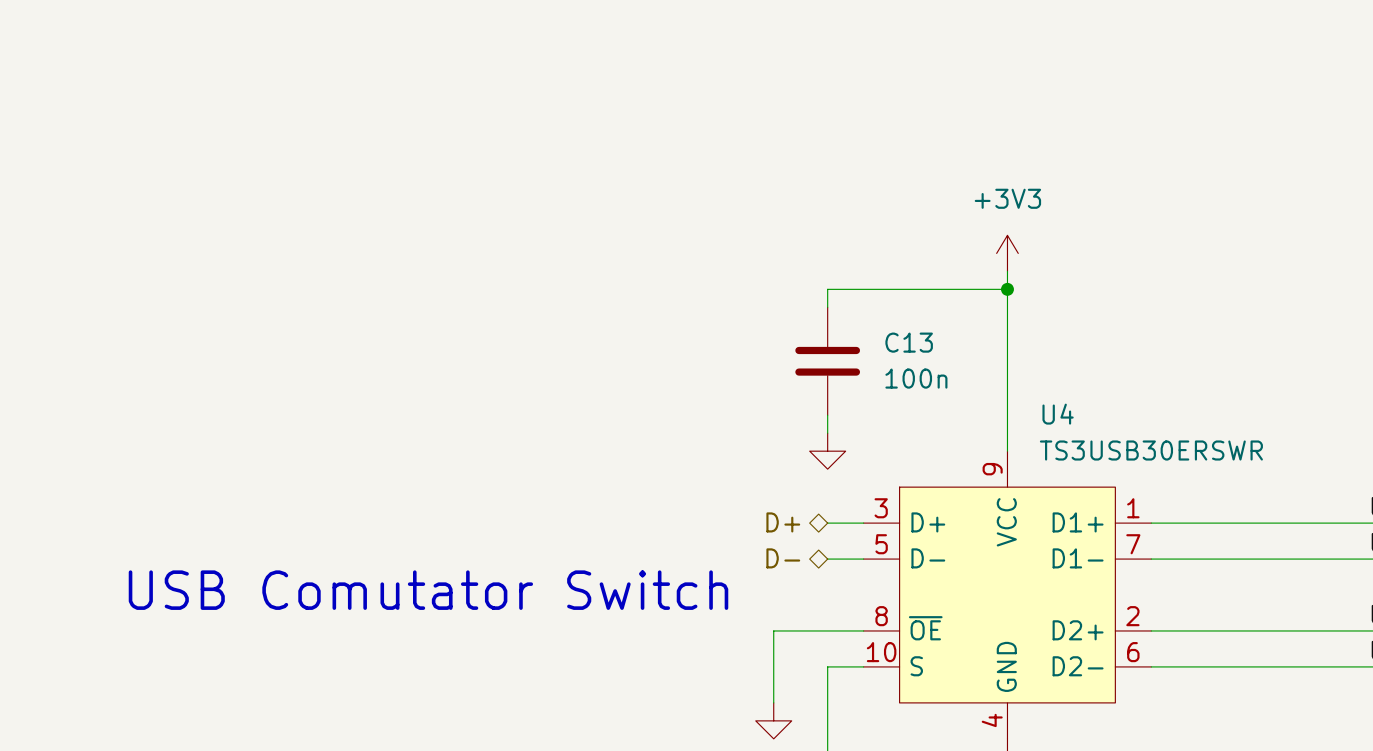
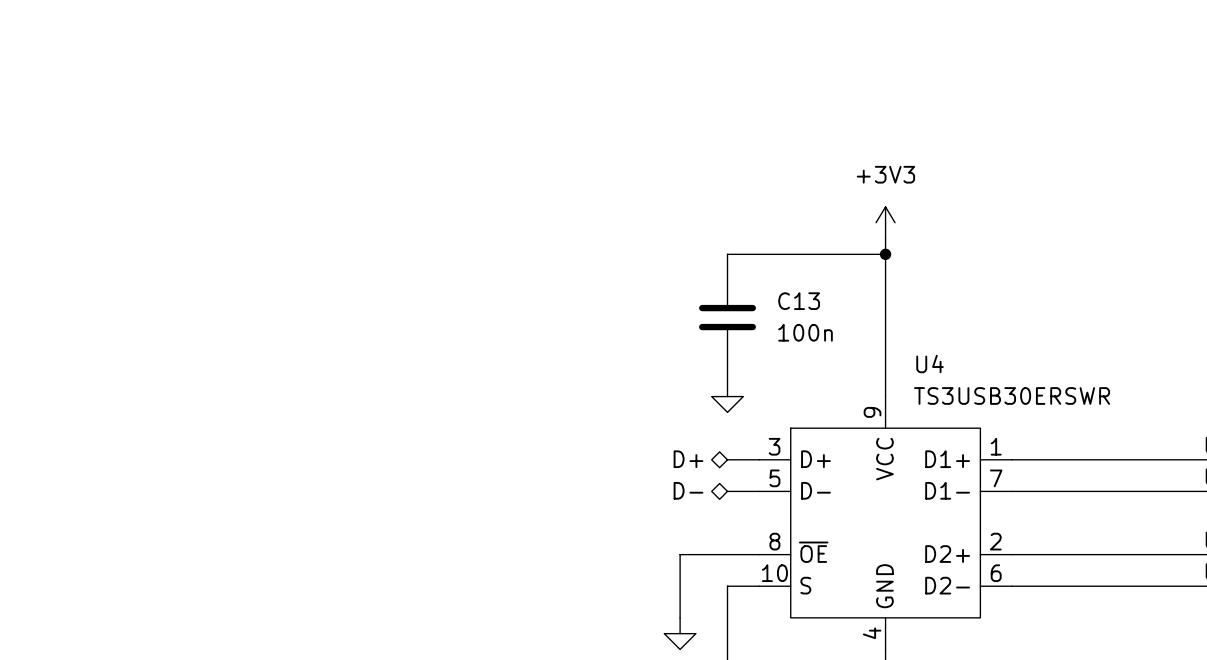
text: USB Comutator Switch (428, 590) -> none

